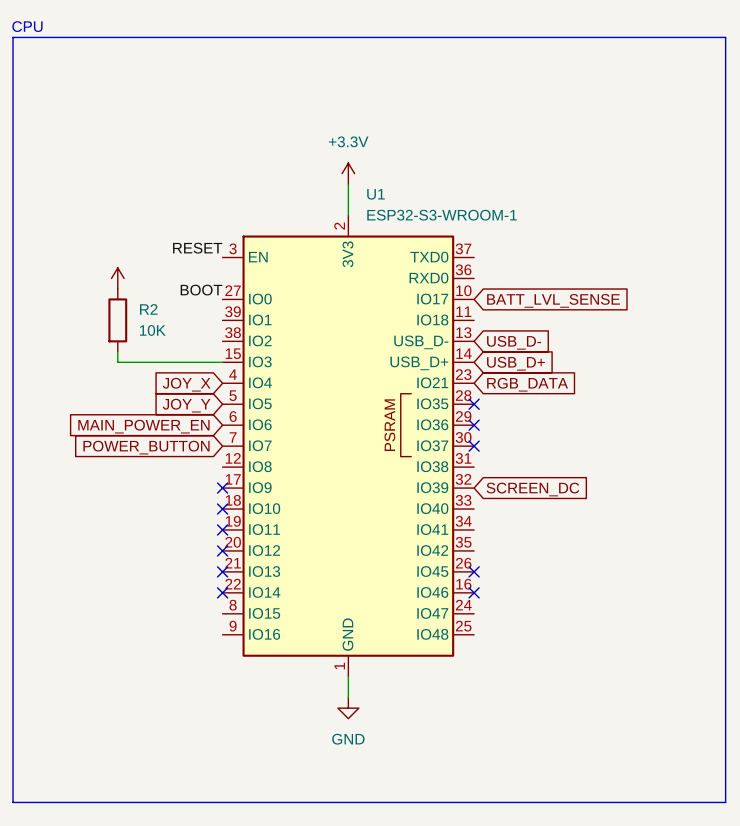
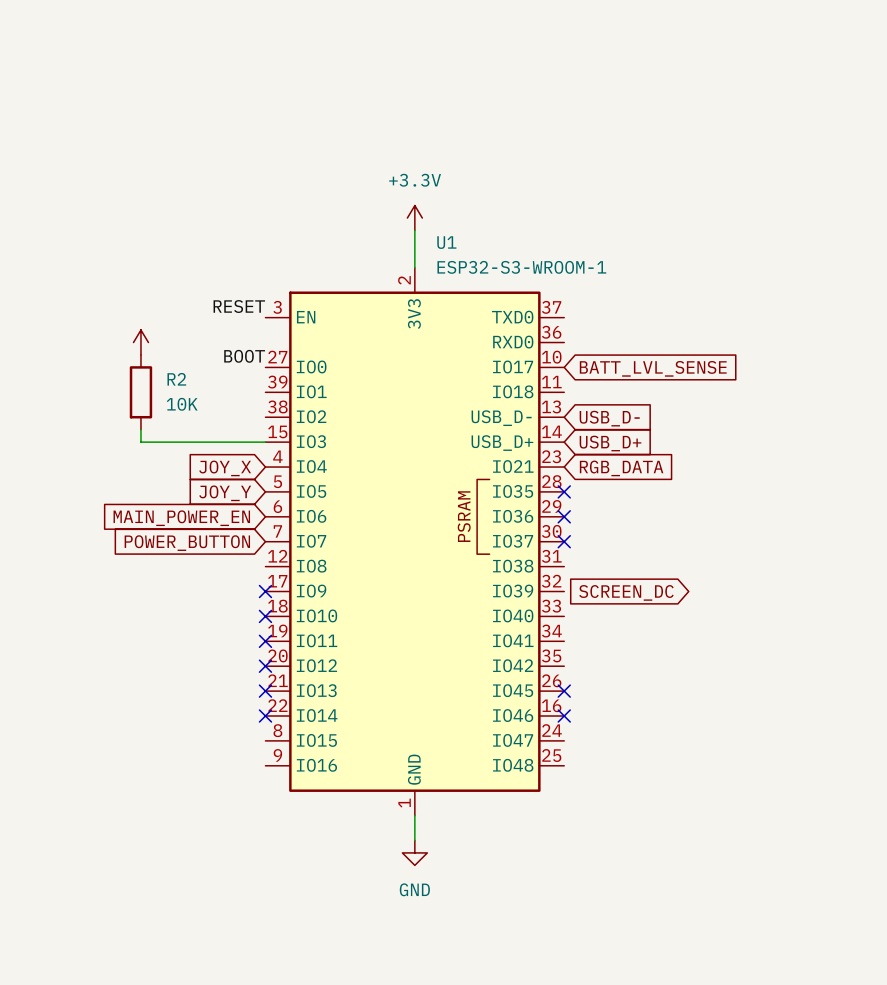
text: CPU (27, 26) -> none
line: (13, 37) (725, 37) (725, 802) (13, 802) (13, 37) -> none
global label rotation: 0° (532, 489) -> 180° (626, 592)

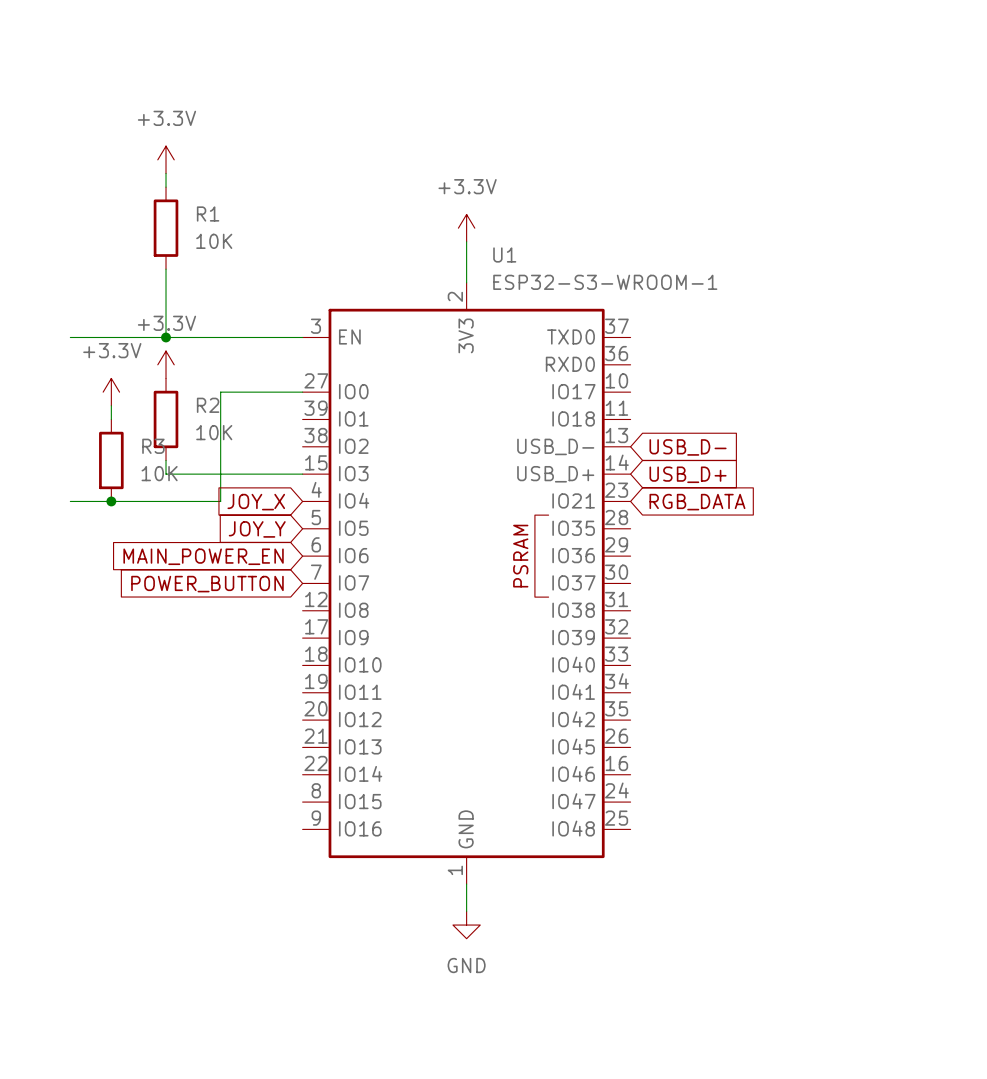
power symbol: none -> +3.3V (166, 159)
wire: none -> (166, 173) (166, 187)
R1: none -> 10K (166, 228)
wire: none -> (166, 269) (166, 337)
power symbol text: none -> +3.3V (166, 323)
label: RESET (239, 306) -> none
wire: none -> (70, 337) (302, 337)
junction: none -> (166, 337)
label: BOOT (244, 356) -> none
power symbol: none -> +3.3V (111, 392)
wire: none -> (302, 392) (220, 392) (220, 501) (70, 501)
global label: BATT_LVL_SENSE (653, 368) -> none
wire: none -> (111, 405) (111, 419)
R3: none -> 10K (111, 460)
junction: none -> (111, 501)
no-connect mark: (564, 491) -> none
no-connect mark: (564, 516) -> none
no-connect mark: (564, 541) -> none
no-connect mark: (265, 591) -> none
global label: SCREEN_DC (626, 592) -> none
no-connect mark: (265, 616) -> none
no-connect mark: (265, 641) -> none
no-connect mark: (265, 666) -> none
no-connect mark: (265, 691) -> none
no-connect mark: (564, 691) -> none
no-connect mark: (265, 716) -> none
no-connect mark: (564, 716) -> none

